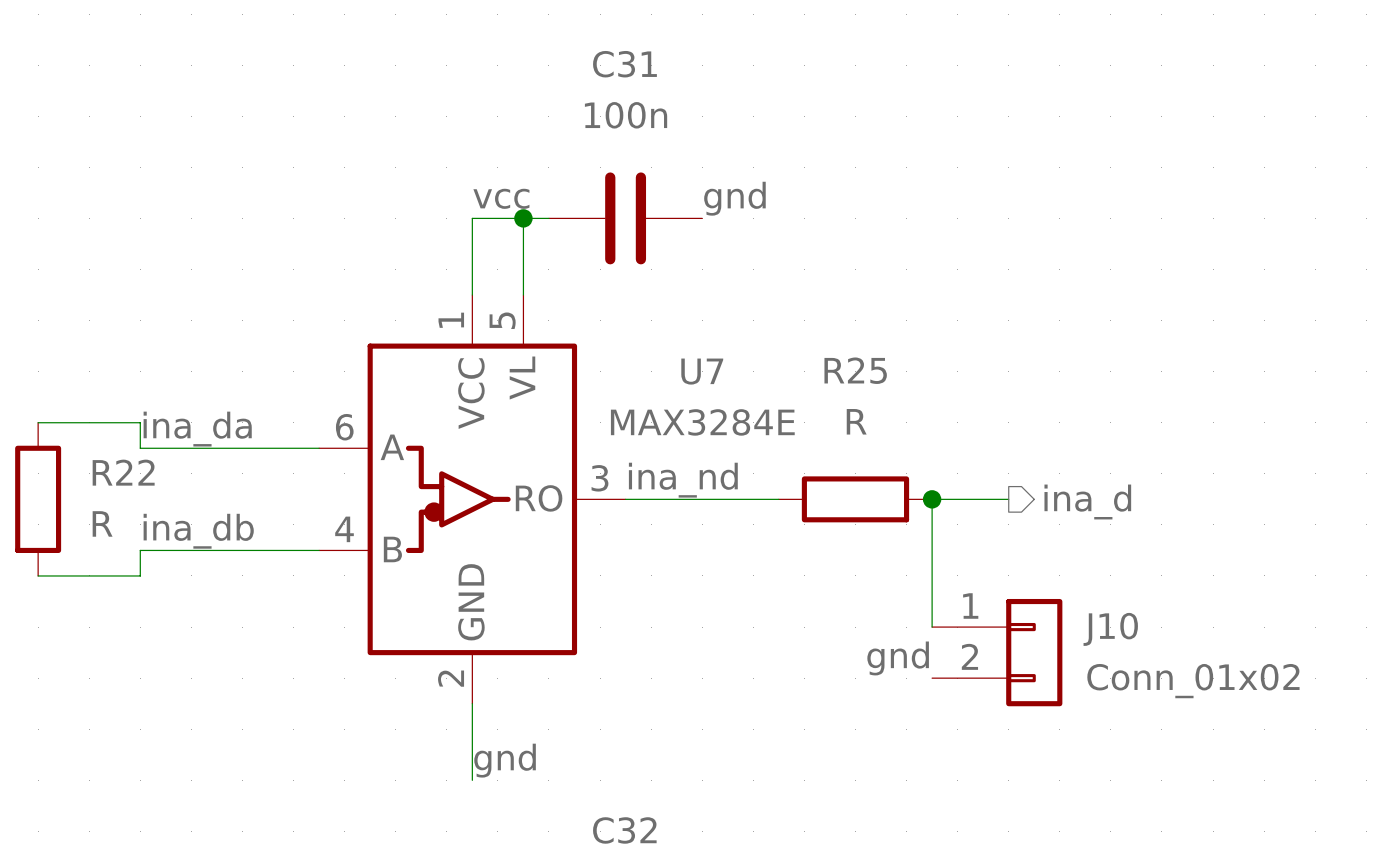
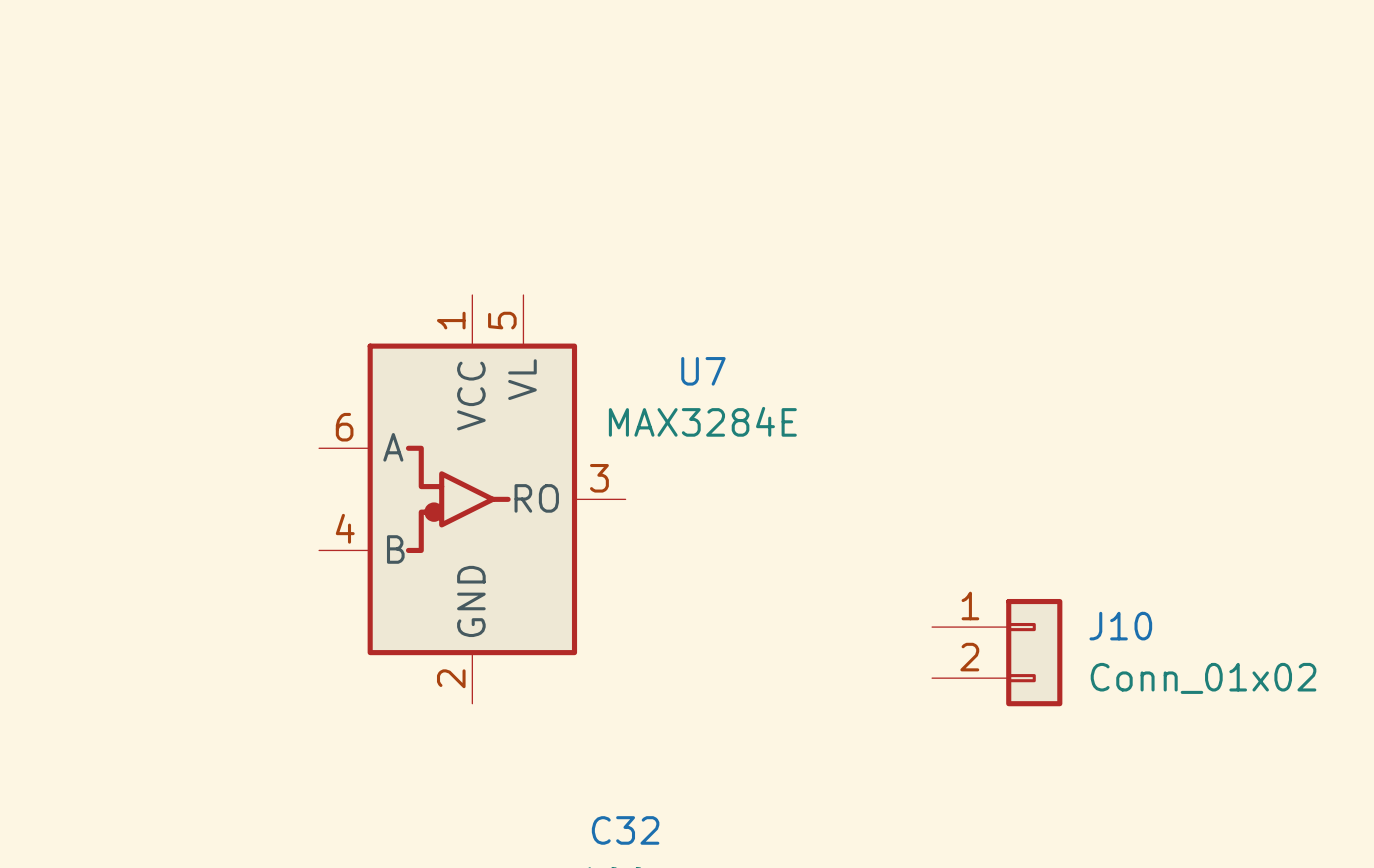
label: vcc (501, 198) -> none
label: gnd (734, 198) -> none
wire: (523, 218) (523, 295) -> none
junction: (523, 218) -> none
wire: (548, 218) (472, 218) (472, 295) -> none
C31: 100n (625, 218) -> none
wire: (38, 422) (140, 422) (140, 448) (319, 448) -> none
label: ina_da (197, 429) -> none
label: ina_nd (683, 480) -> none
R22: R (38, 499) -> none
wire: (625, 499) (778, 499) -> none
R25: R (855, 499) -> none
junction: (932, 499) -> none
wire: (1008, 499) (932, 499) (932, 627) -> none
hierarchical label: ina_d (1087, 501) -> none
label: ina_db (198, 531) -> none
wire: (319, 550) (140, 550) (140, 575) (38, 575) -> none
label: gnd (898, 658) -> none
wire: (472, 703) (472, 780) -> none
label: gnd (505, 760) -> none

